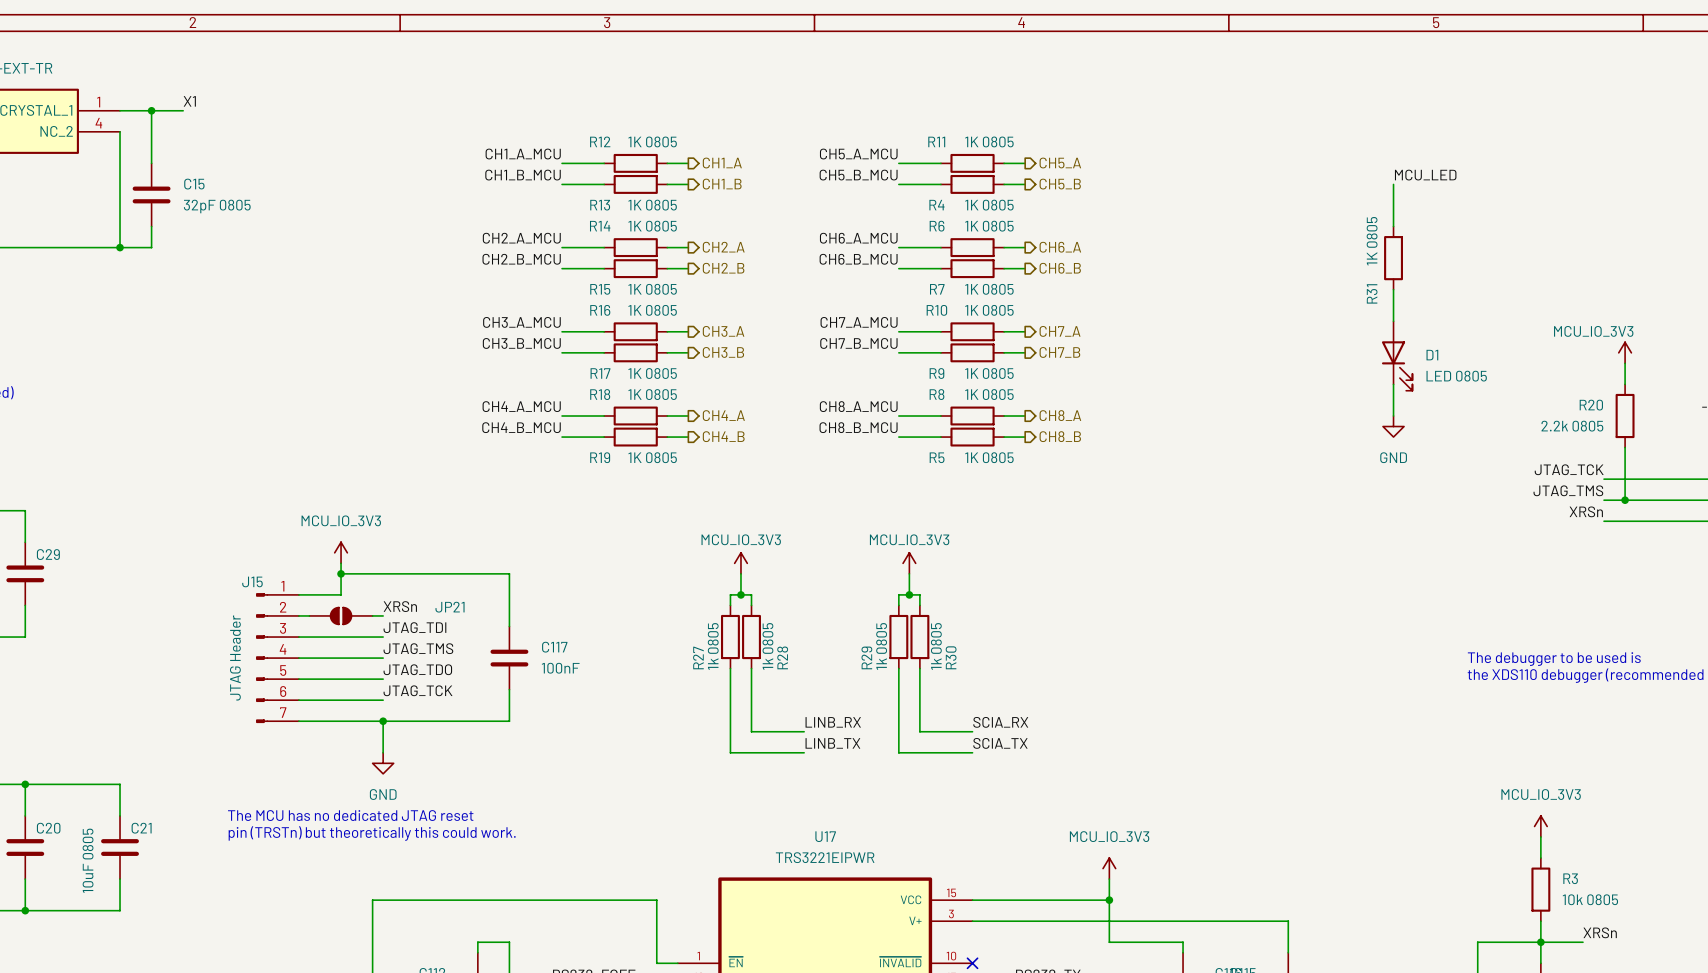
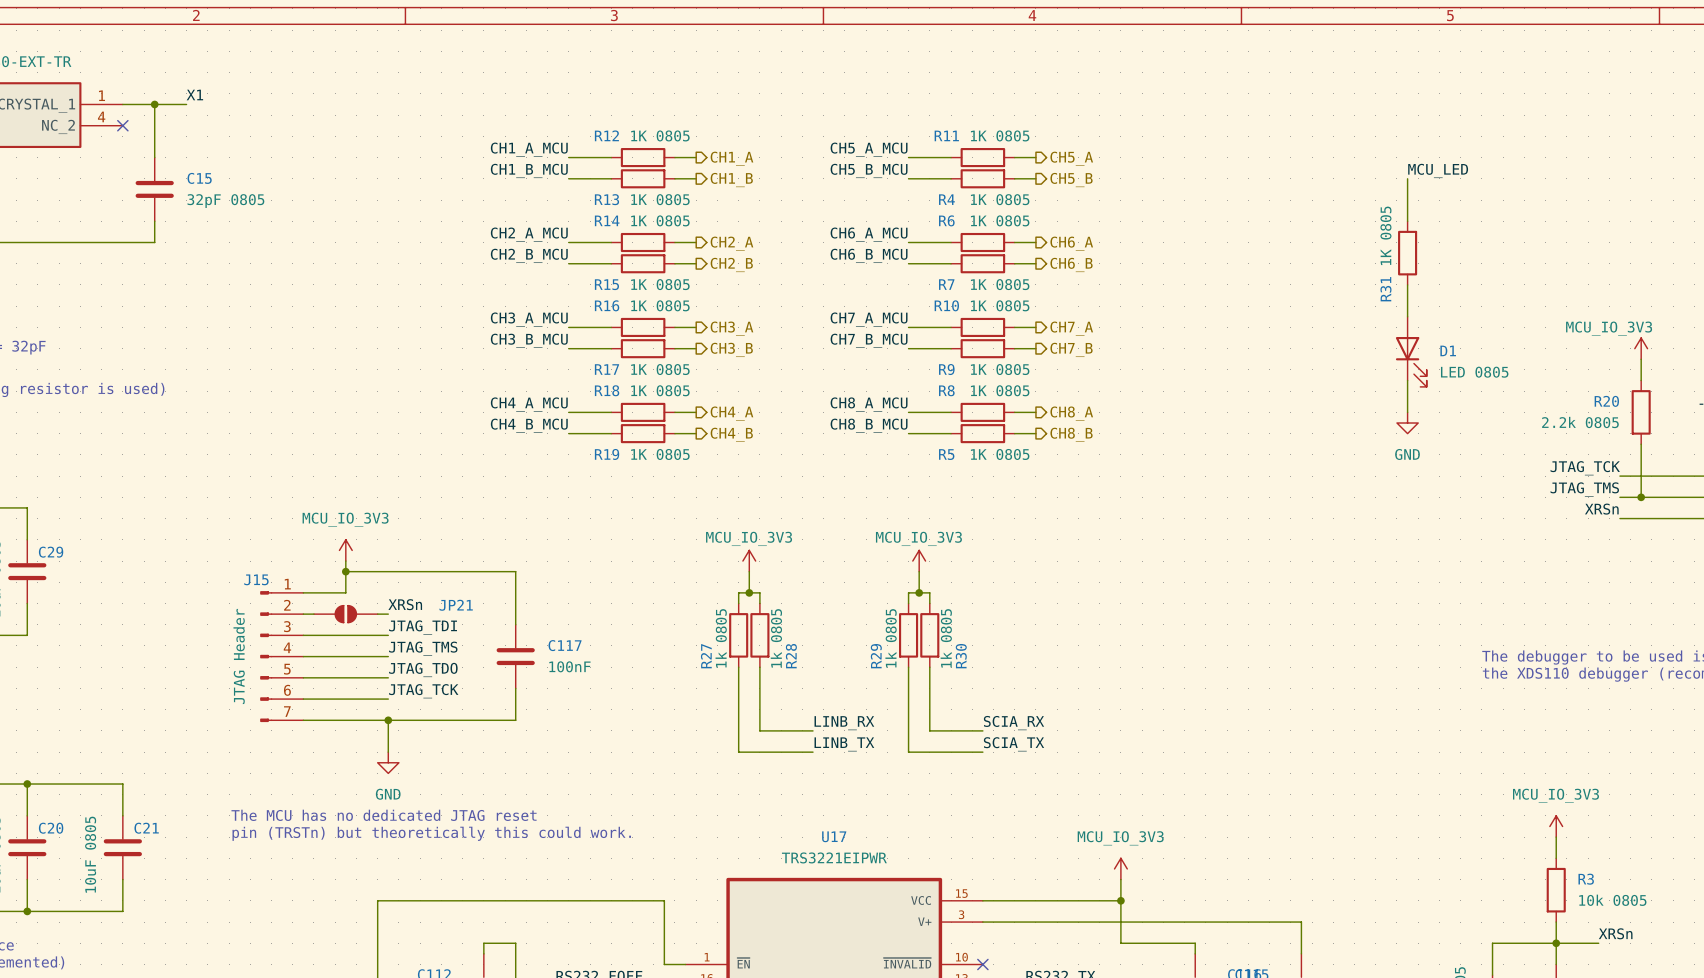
wire: (120, 131) (120, 247) -> none
no-connect mark: none -> (122, 125)
junction: (120, 247) -> none

